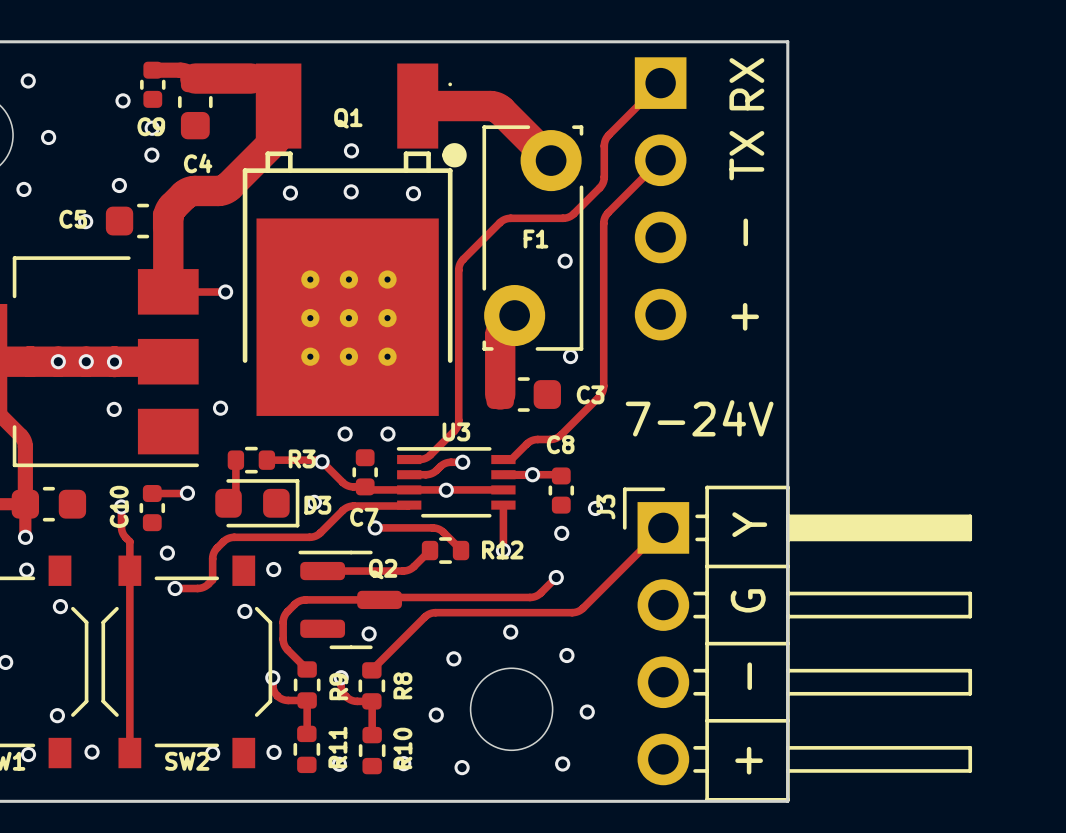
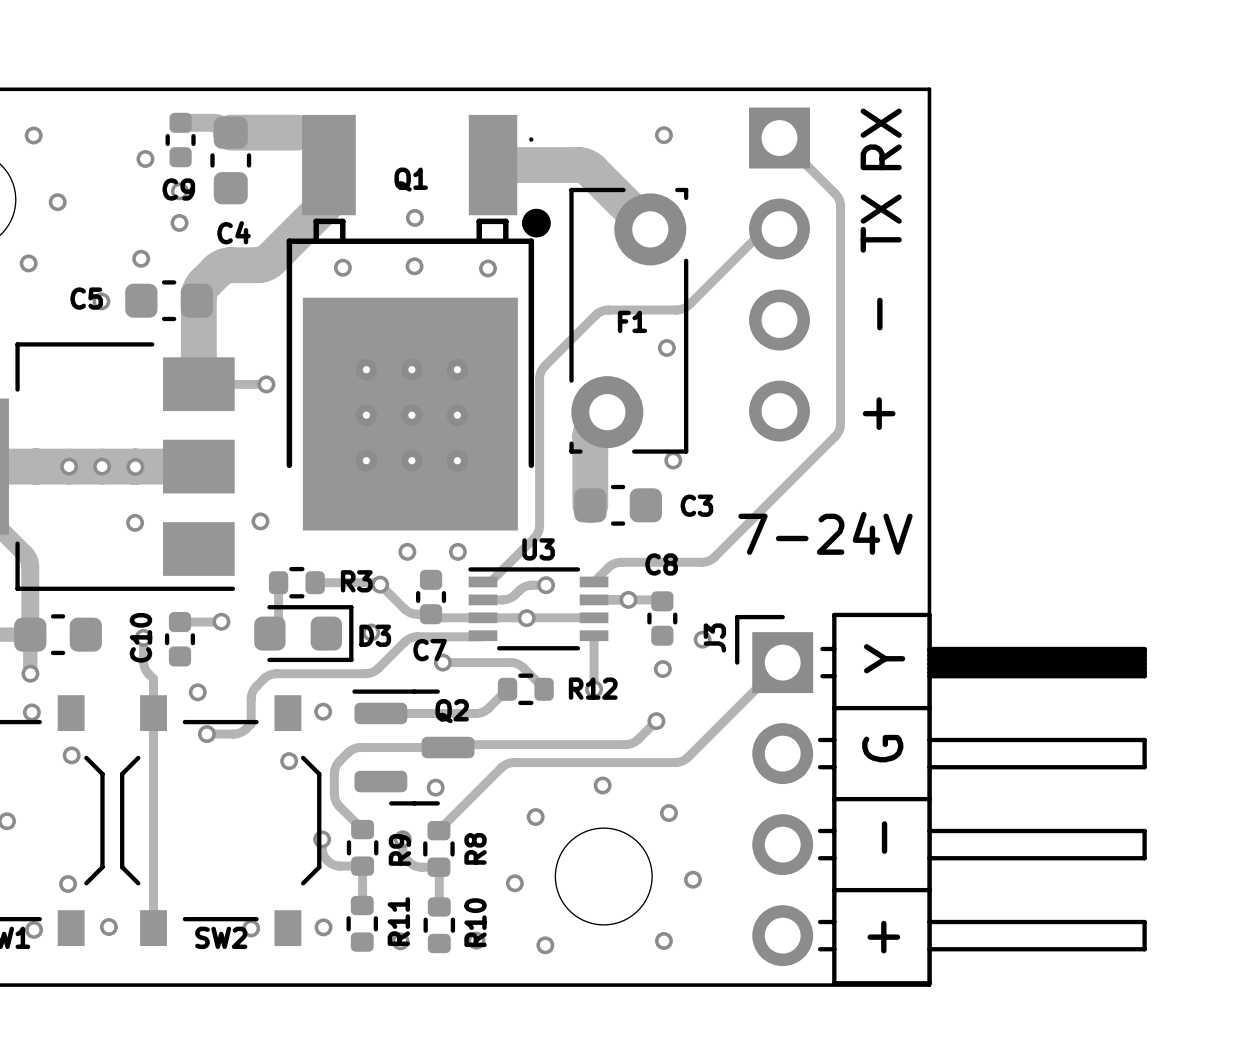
via: none -> (663, 135)
track: (660, 83) (606, 138) (604, 144) (603, 182) (573, 213) (564, 218) (504, 219) (461, 261) (458, 270) (458, 423) (455, 430) (428, 456) (415, 459) -> (779, 229) (768, 229) (760, 233) (685, 307) (676, 310) (601, 311) (543, 367) (539, 378) (539, 528) (534, 538) (490, 581)
track: none -> (779, 138) (835, 193) (840, 203) (839, 430) (711, 559) (701, 562) (618, 562) (610, 566) (594, 581)
track: (660, 160) (608, 212) (604, 219) (603, 385) (601, 393) (559, 436) (552, 439) (531, 440) (511, 459) -> none

